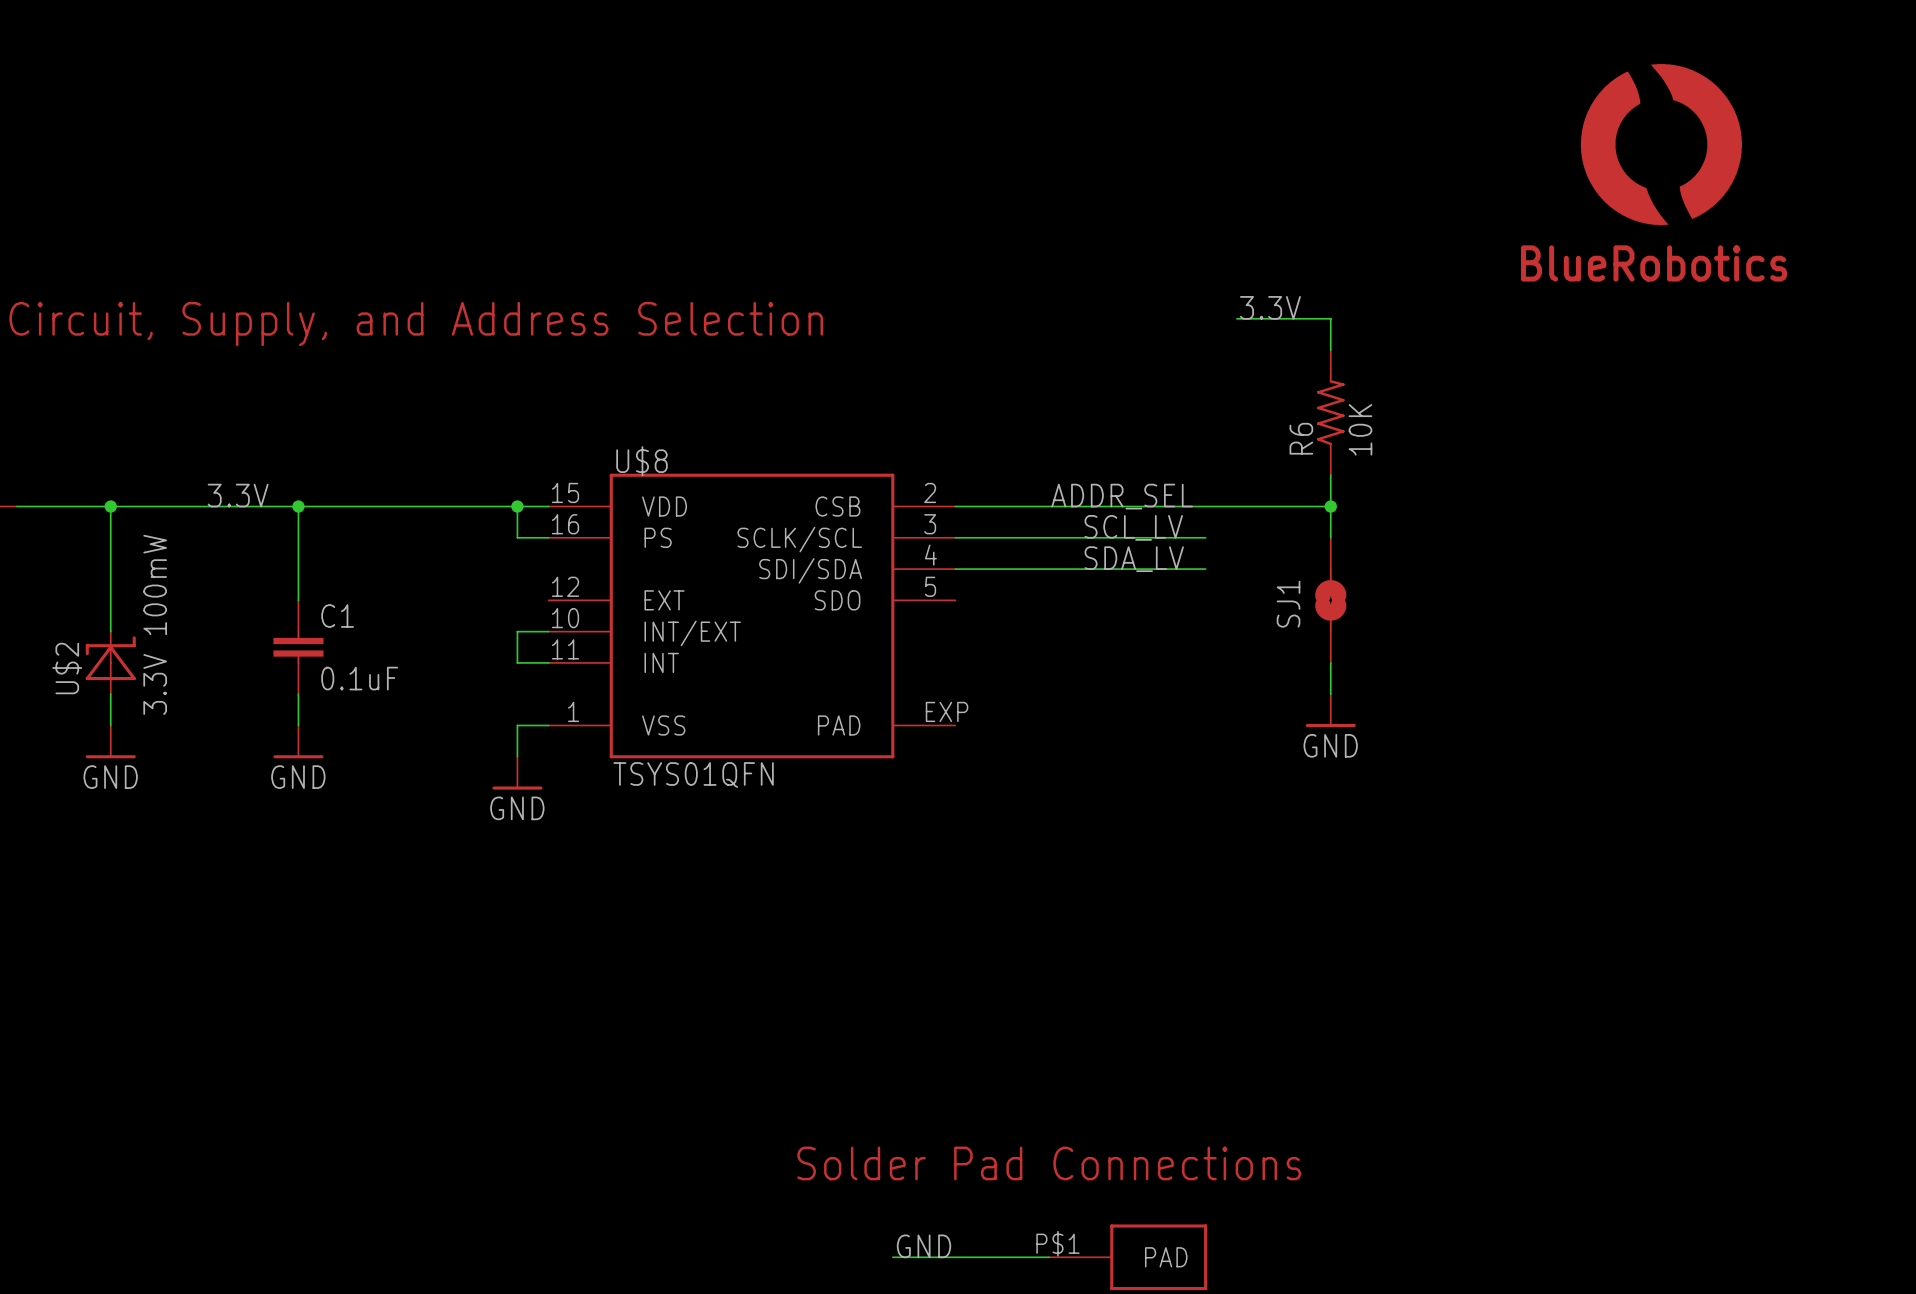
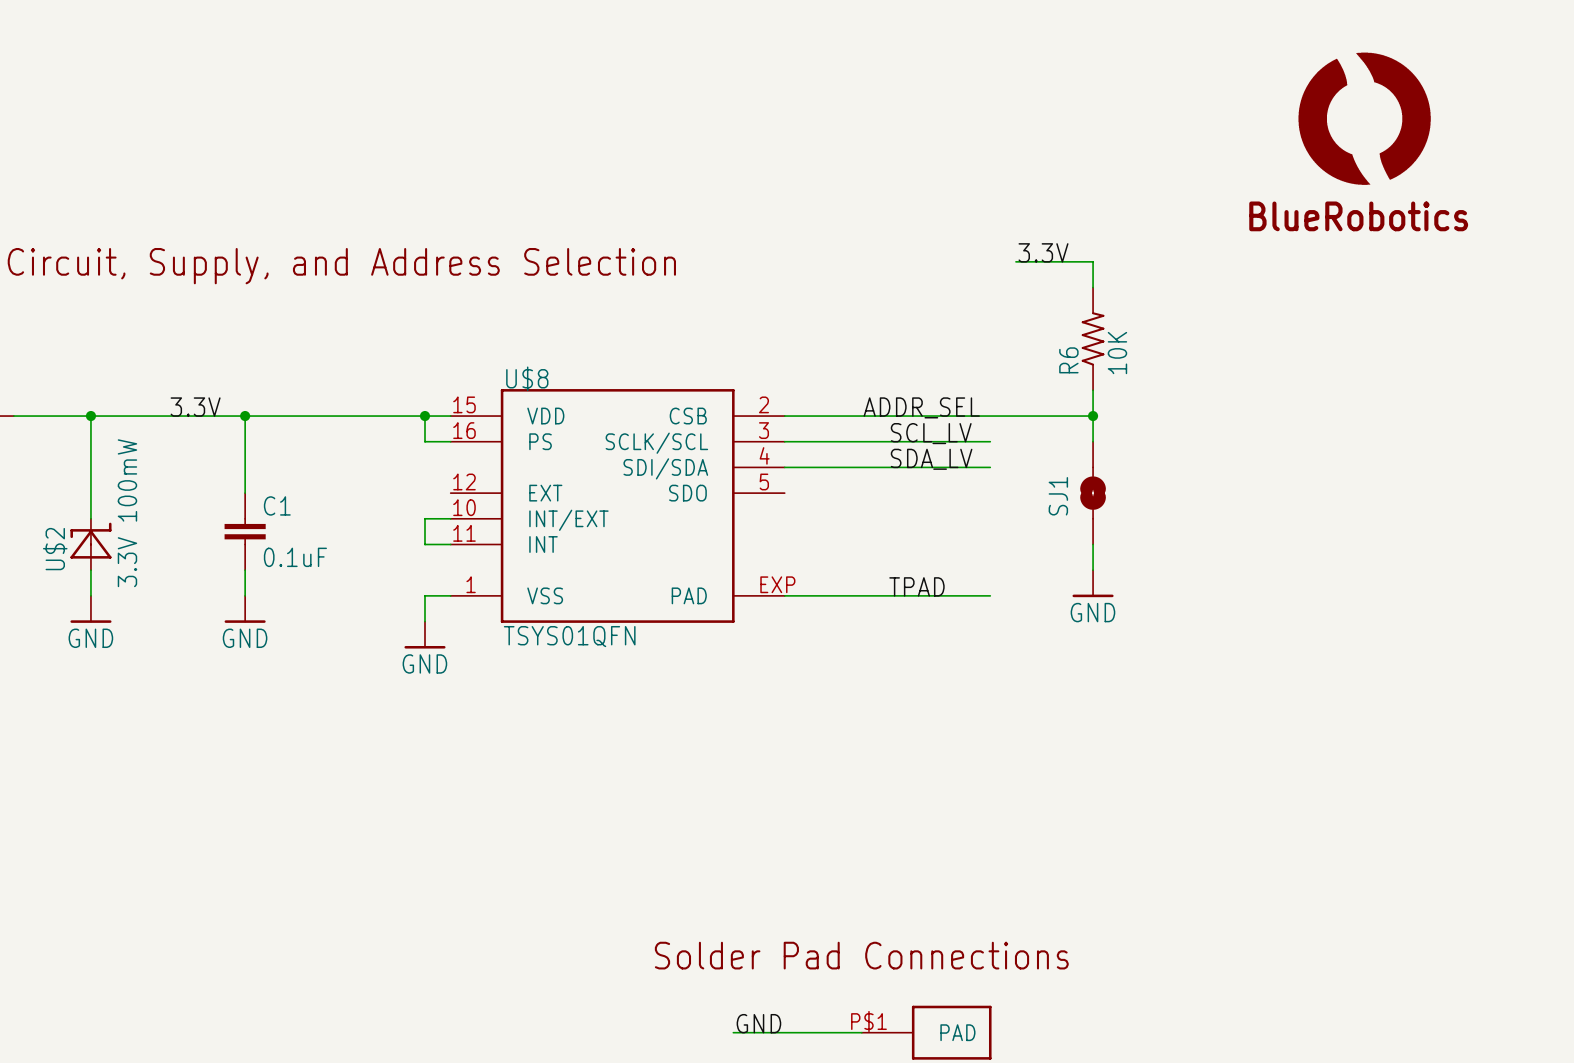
label: none -> TPAD (916, 586)
wire: none -> (784, 595) (990, 595)

